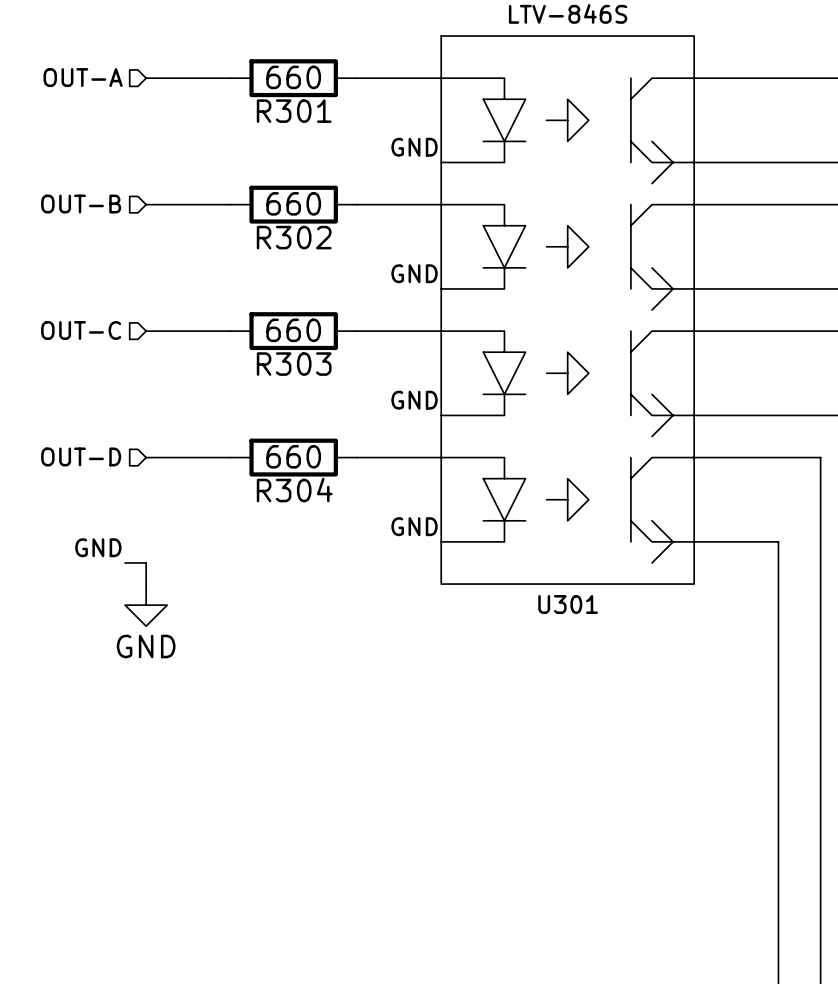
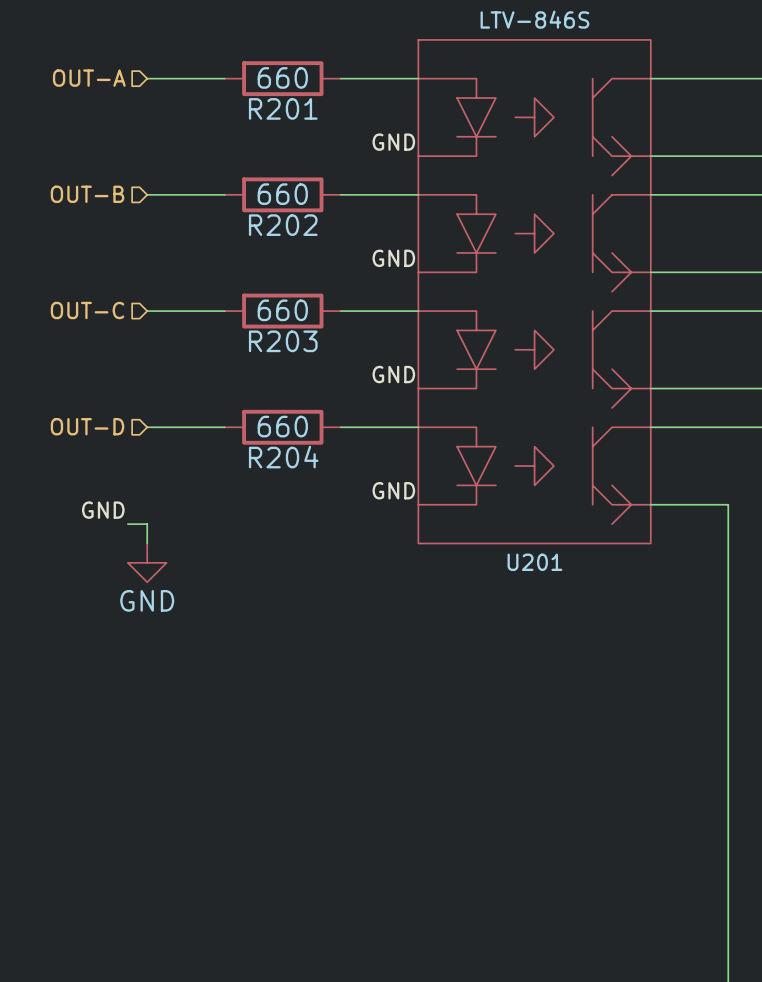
R301 name: R301 (294, 111) -> R201 (283, 108)
R302 name: R302 (294, 237) -> R202 (283, 225)
R303 name: R303 (294, 364) -> R203 (283, 341)
R304 name: R304 (294, 490) -> R204 (283, 457)
U301 name: U301 (568, 604) -> U201 (534, 562)

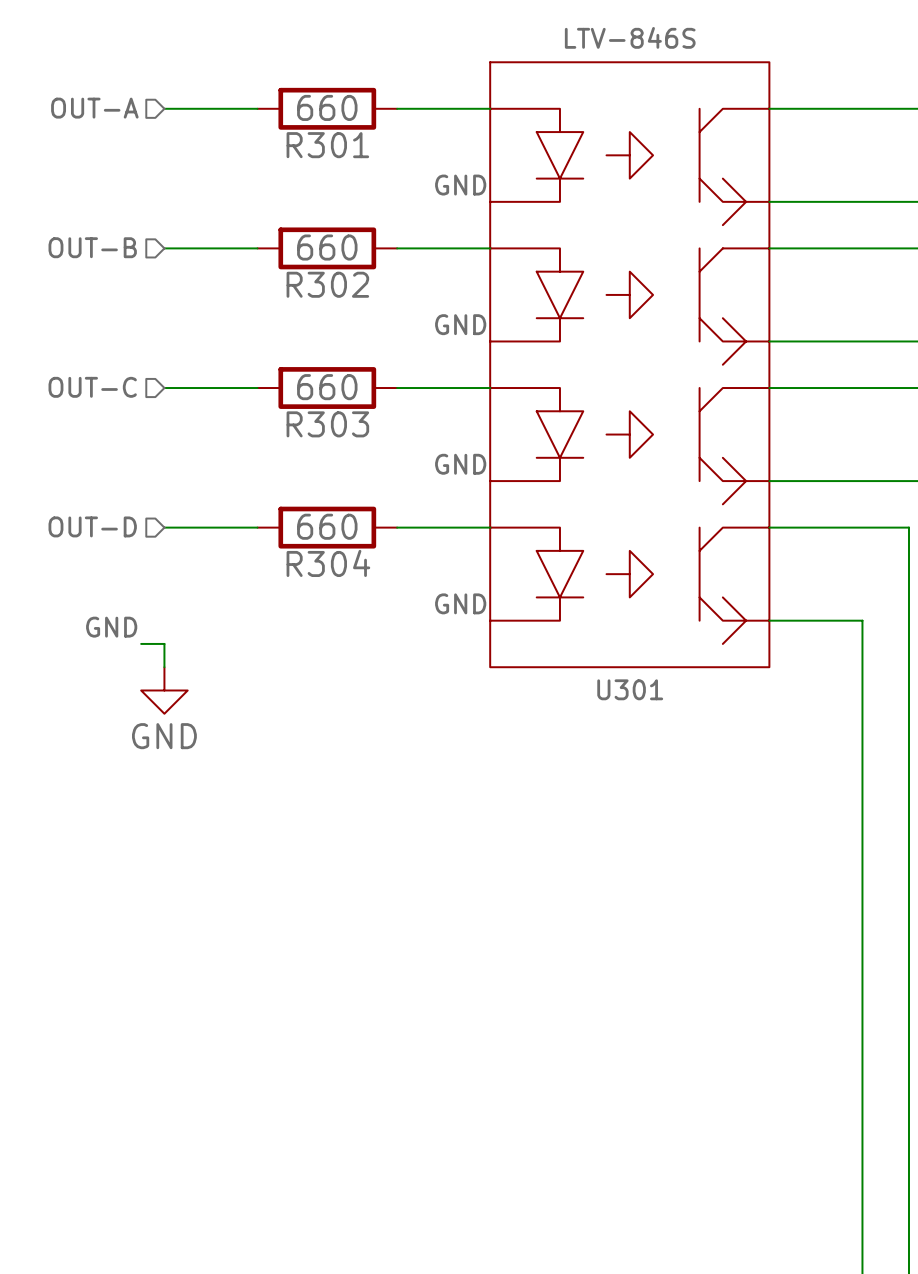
R201 name: R201 (283, 108) -> R301 (327, 145)
R202 name: R202 (283, 225) -> R302 (327, 284)
R203 name: R203 (283, 341) -> R303 (327, 424)
R204 name: R204 (283, 457) -> R304 (328, 563)
U201 name: U201 (534, 562) -> U301 (630, 689)

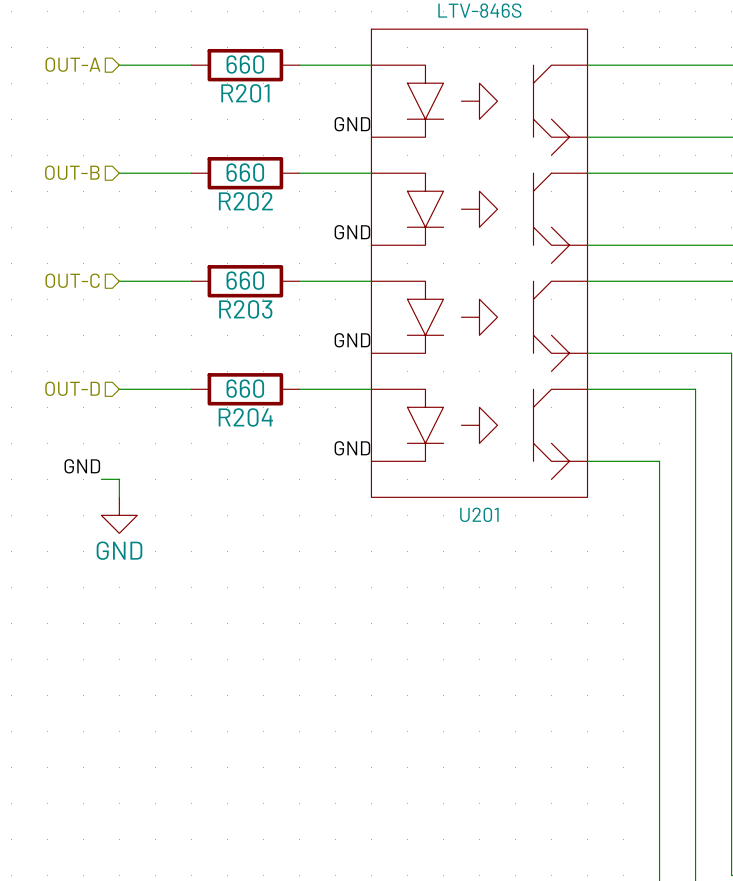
R301 name: R301 (327, 145) -> R201 (245, 93)
R302 name: R302 (327, 284) -> R202 (245, 201)
R303 name: R303 (327, 424) -> R203 (245, 309)
R304 name: R304 (328, 563) -> R204 (245, 417)
U301 name: U301 (630, 689) -> U201 (479, 514)

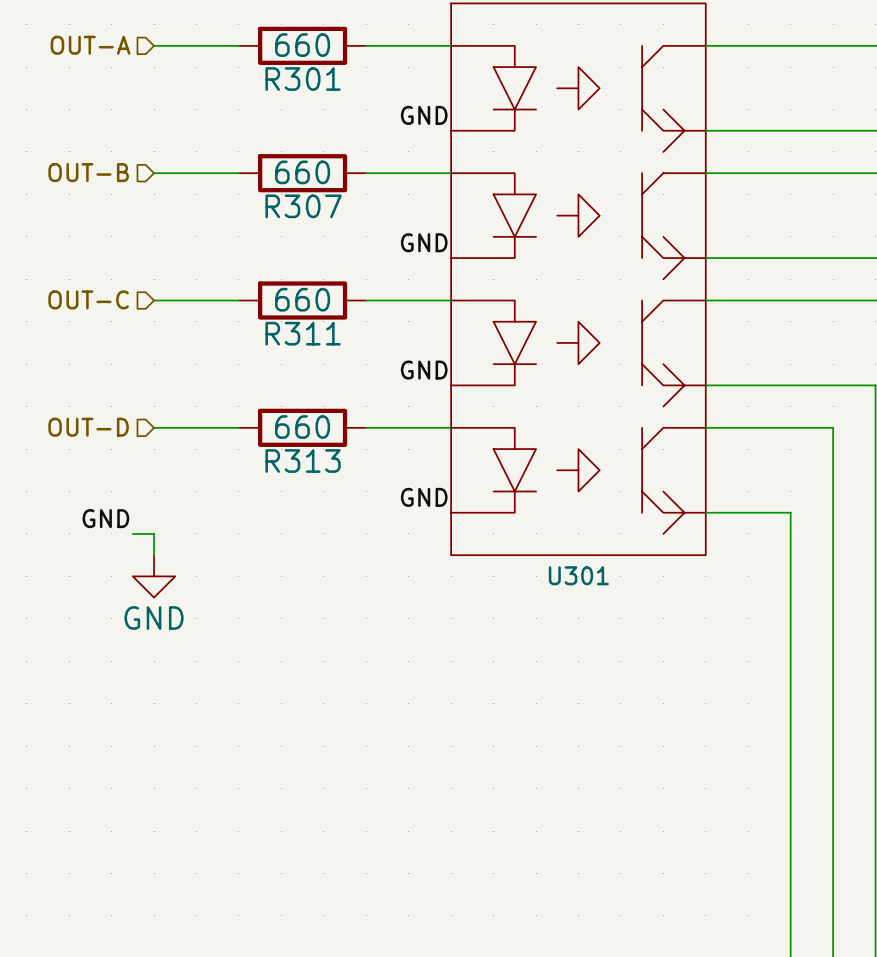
R201 name: R201 (245, 93) -> R301 (303, 79)
R202 name: R202 (245, 201) -> R307 (303, 206)
R203 name: R203 (245, 309) -> R311 (303, 333)
R204 name: R204 (245, 417) -> R313 (303, 461)
U201 name: U201 (479, 514) -> U301 (578, 575)

